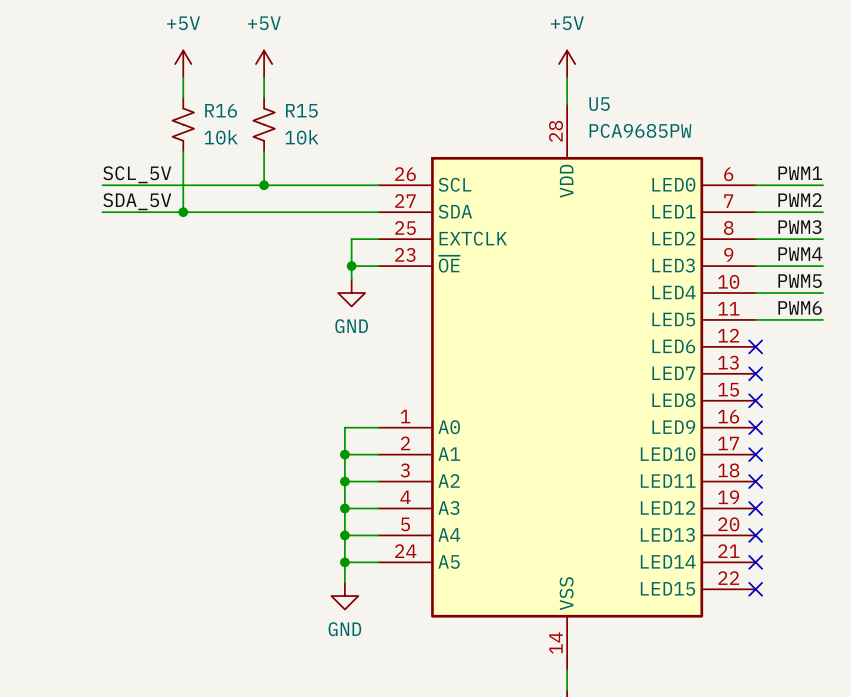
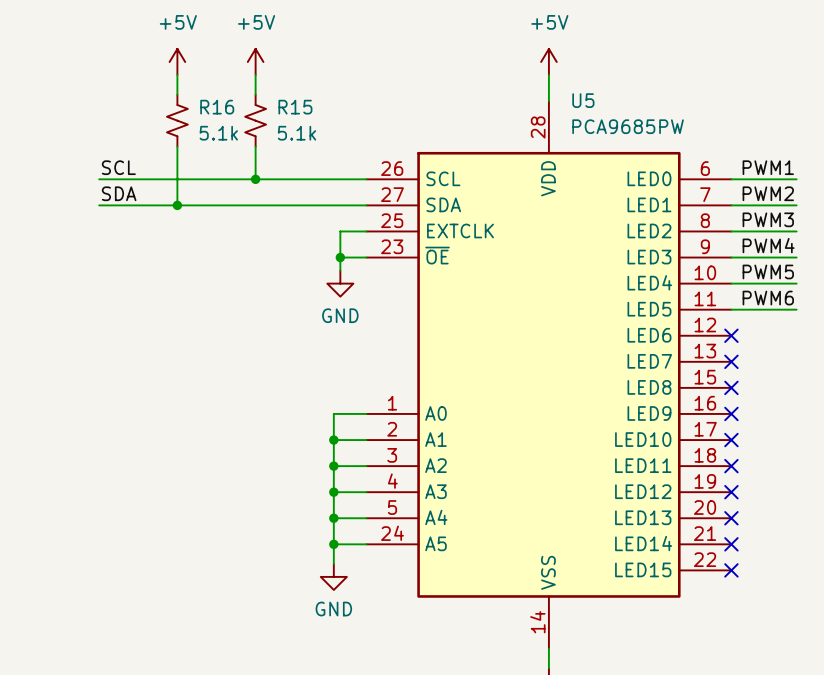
R16 value: 10k (221, 137) -> 5.1k (218, 133)
R15 value: 10k (301, 137) -> 5.1k (296, 133)
label: SCL_5V (137, 174) -> SCL (118, 167)
label: SDA_5V (137, 201) -> SDA (119, 193)

